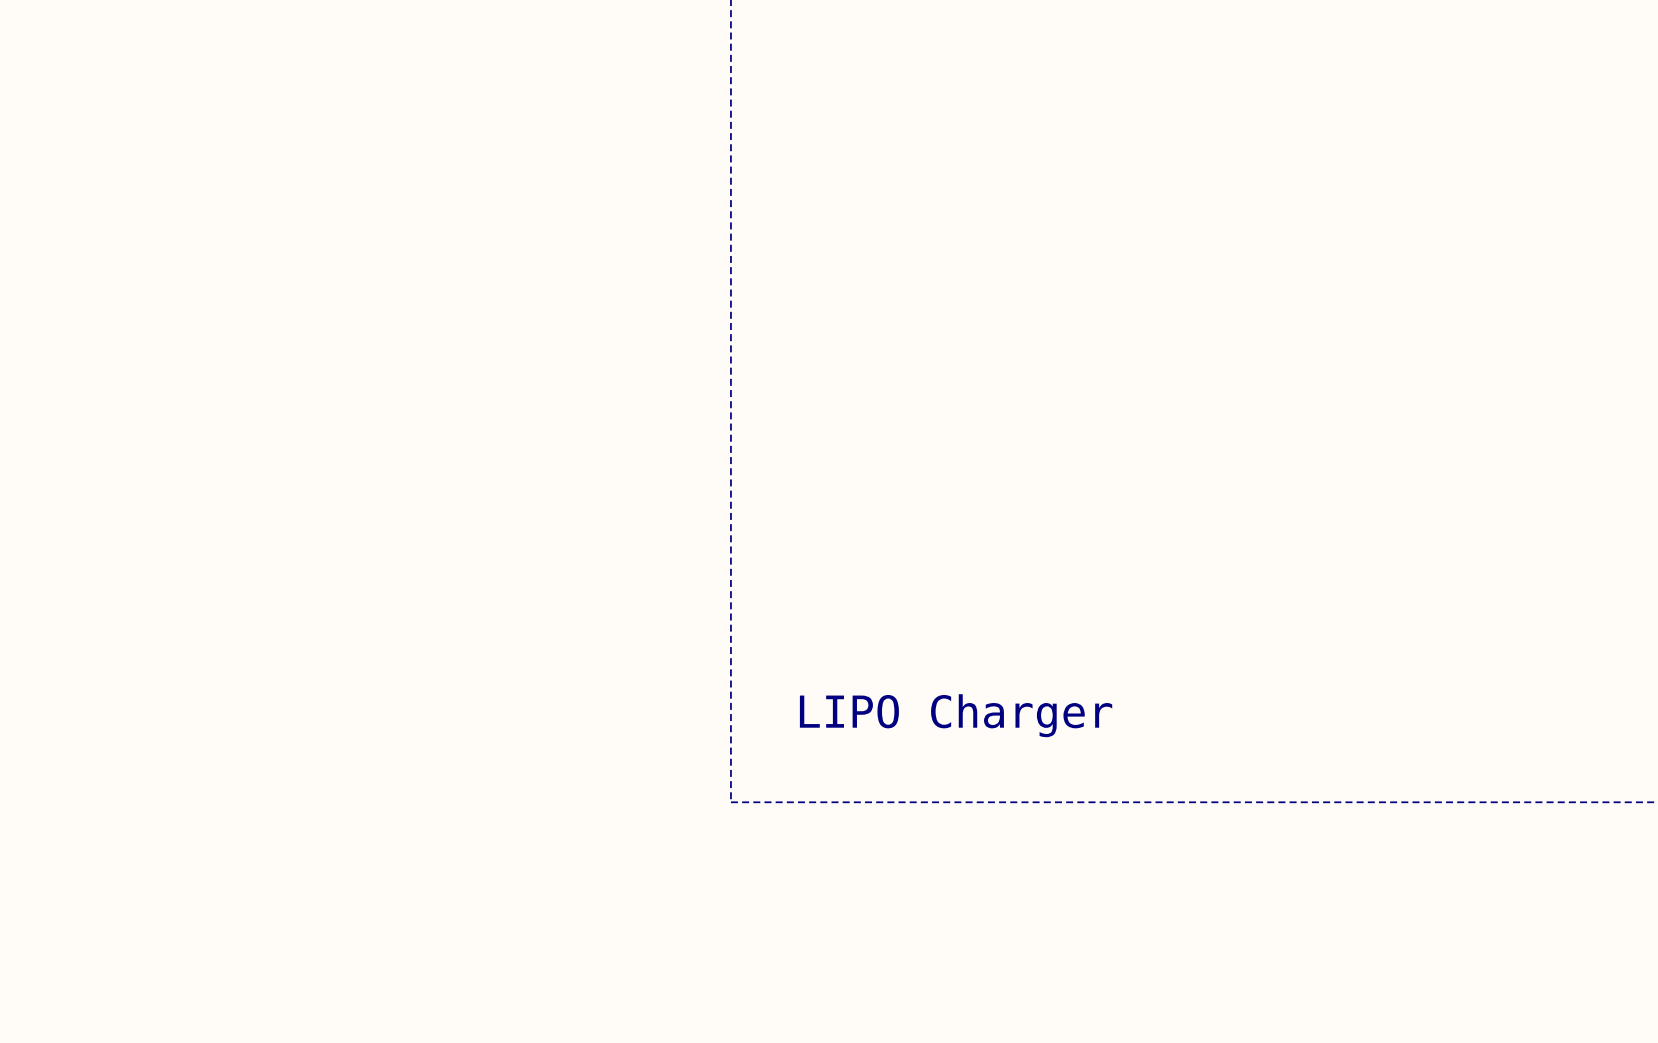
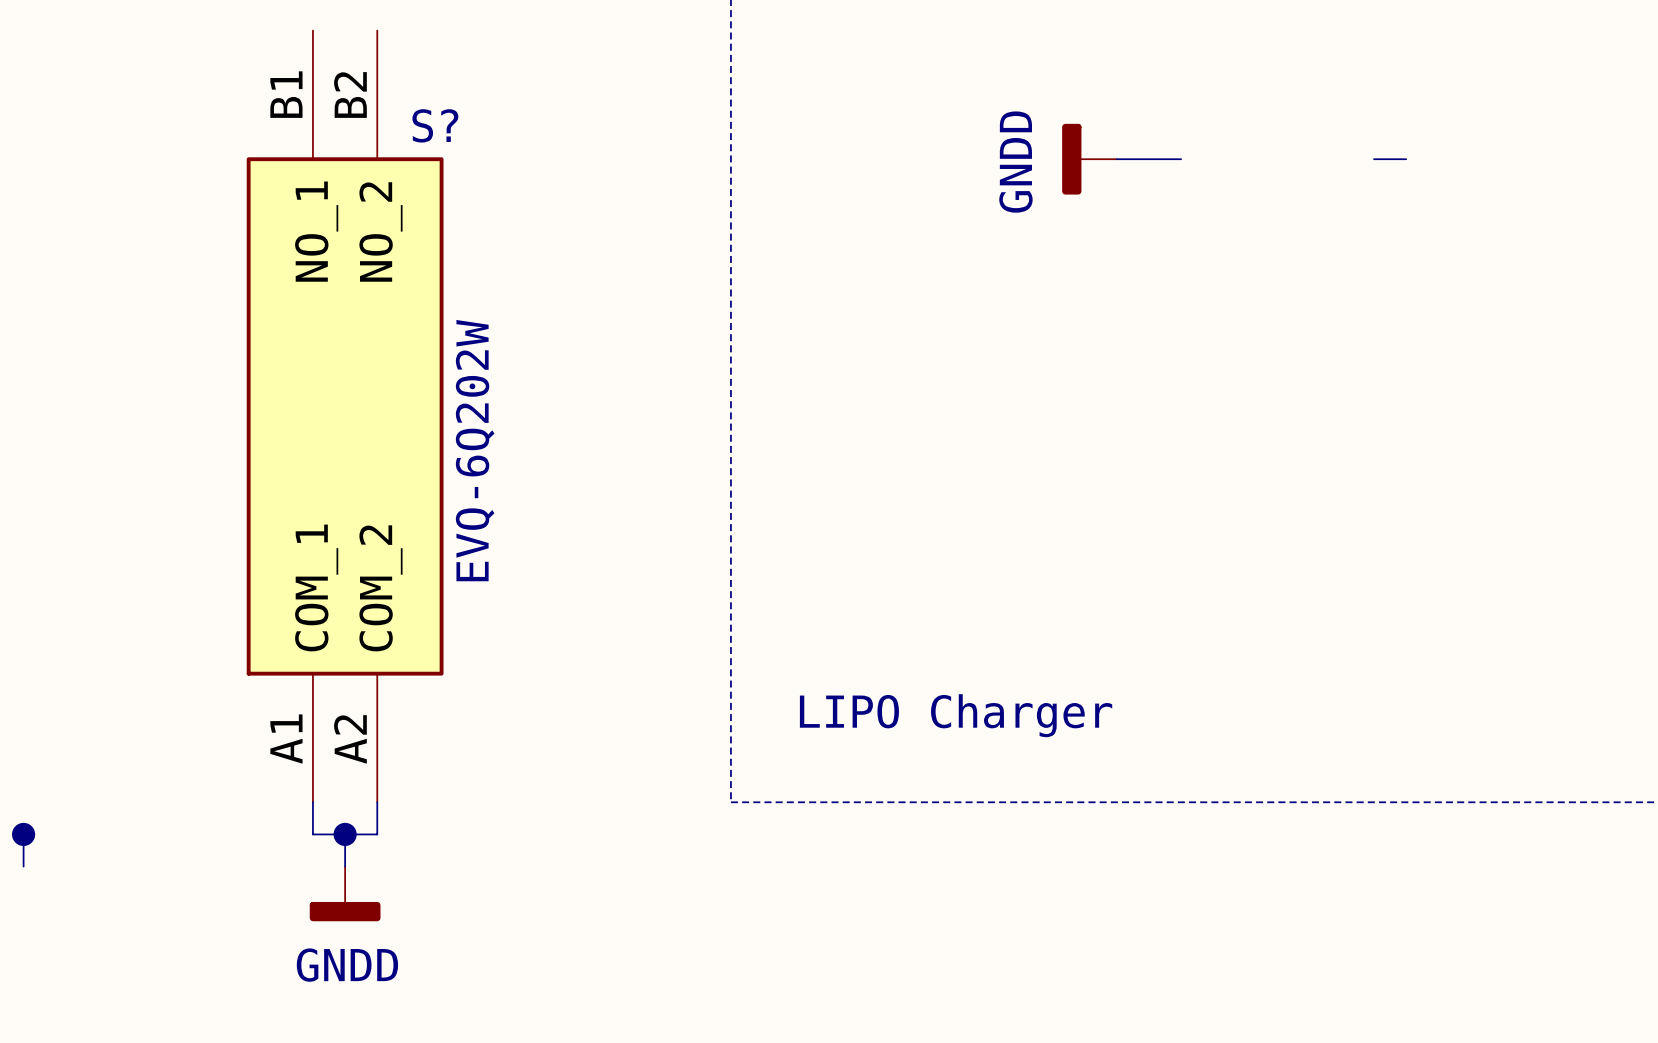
power symbol: none -> GNDD (1089, 159)
wire: none -> (1116, 159) (1181, 159)
wire: none -> (1374, 159) (1406, 159)
S?: none -> EVQ-6Q202W (345, 416)
wire: none -> (312, 802) (312, 834) (377, 834) (377, 802)
wire: none -> (23, 834) (23, 866)
junction: none -> (23, 834)
wire: none -> (345, 834) (345, 866)
junction: none -> (345, 834)
power symbol: none -> GNDD (345, 893)

